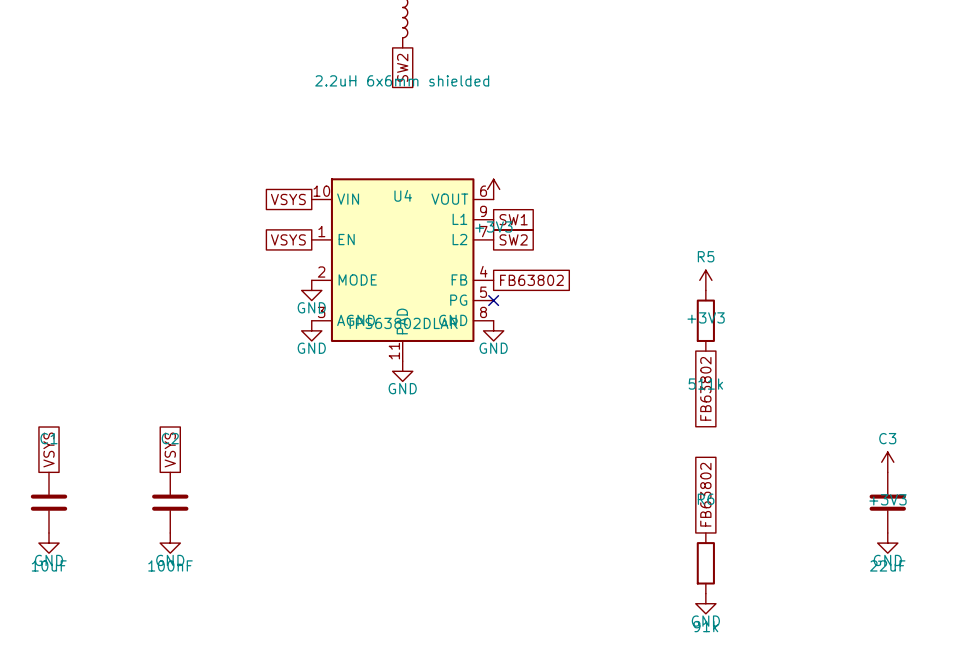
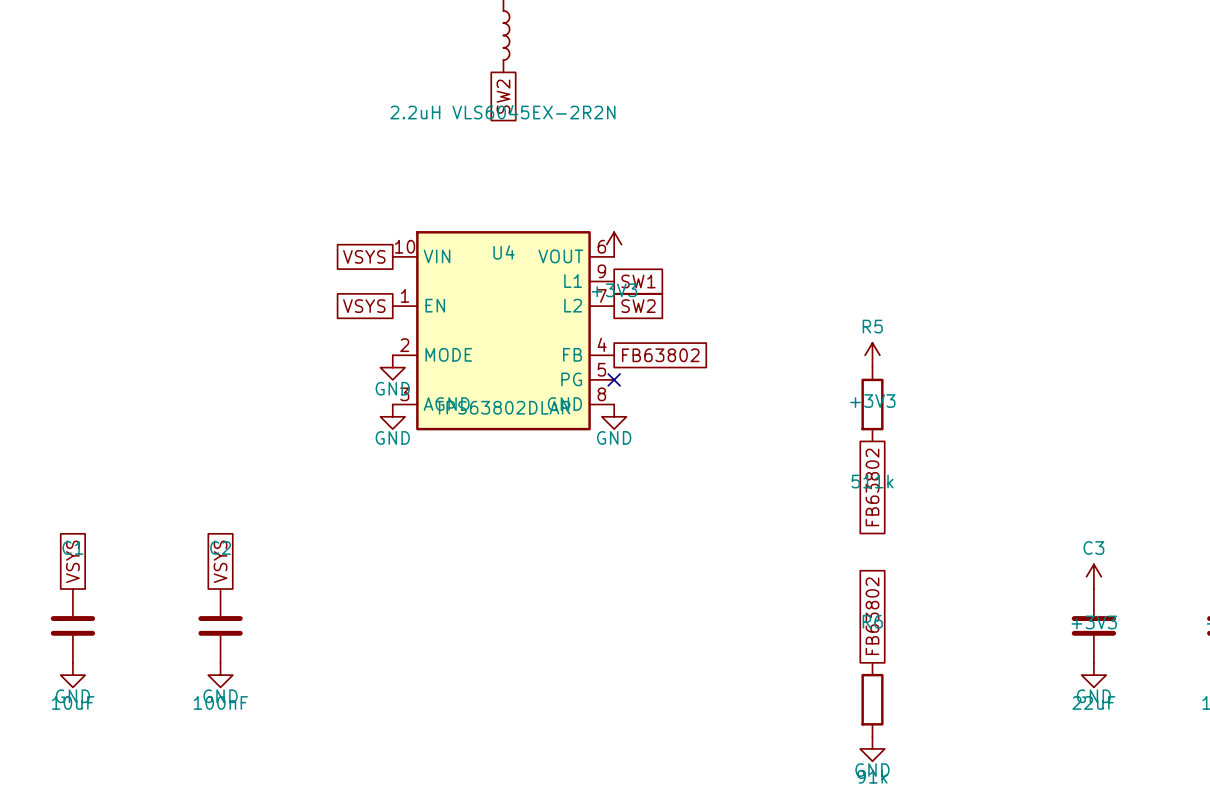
part value: 2.2uH 6x6mm shielded (402, 80) -> 2.2uH VLS6045EX-2R2N (502, 112)
U4 symbol: [311, 178, 494, 362] -> [392, 231, 615, 431]
power symbol: GND (402, 371) -> none

